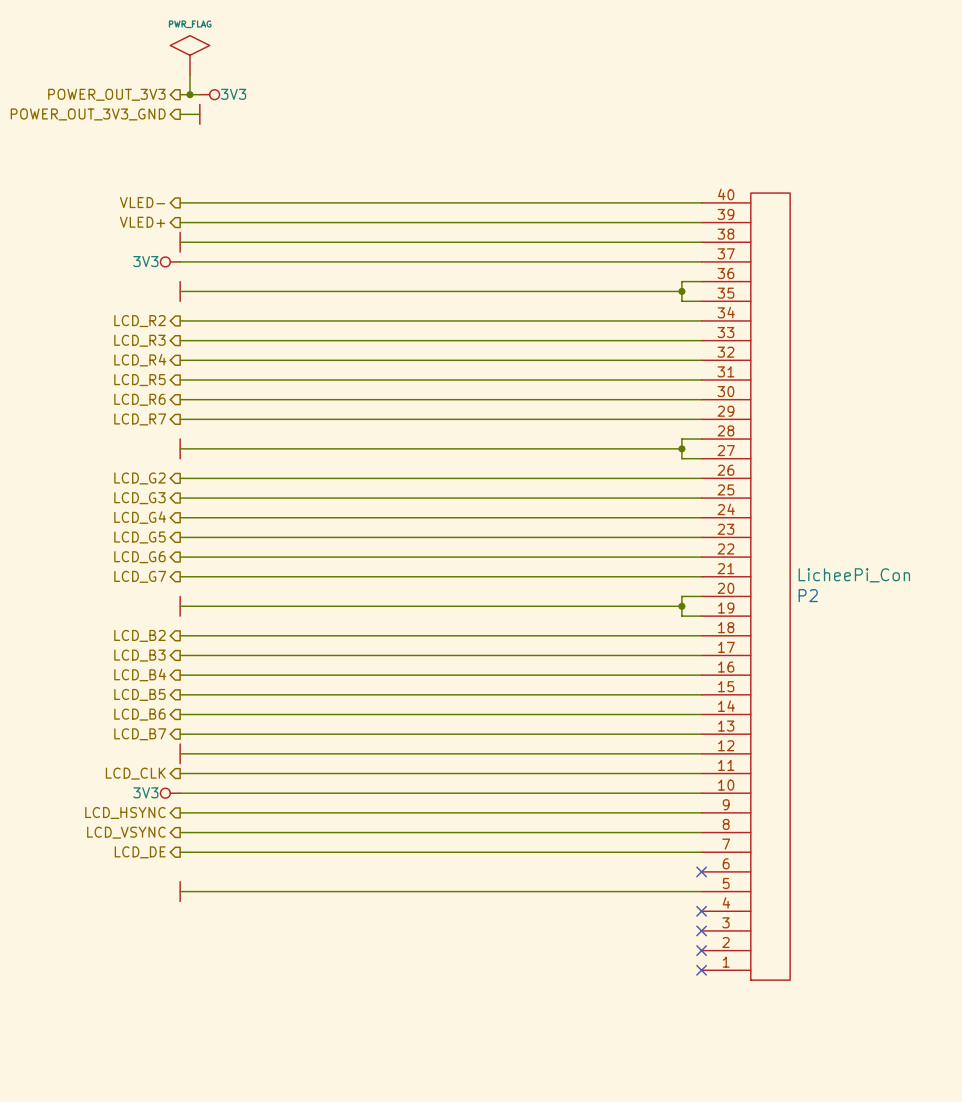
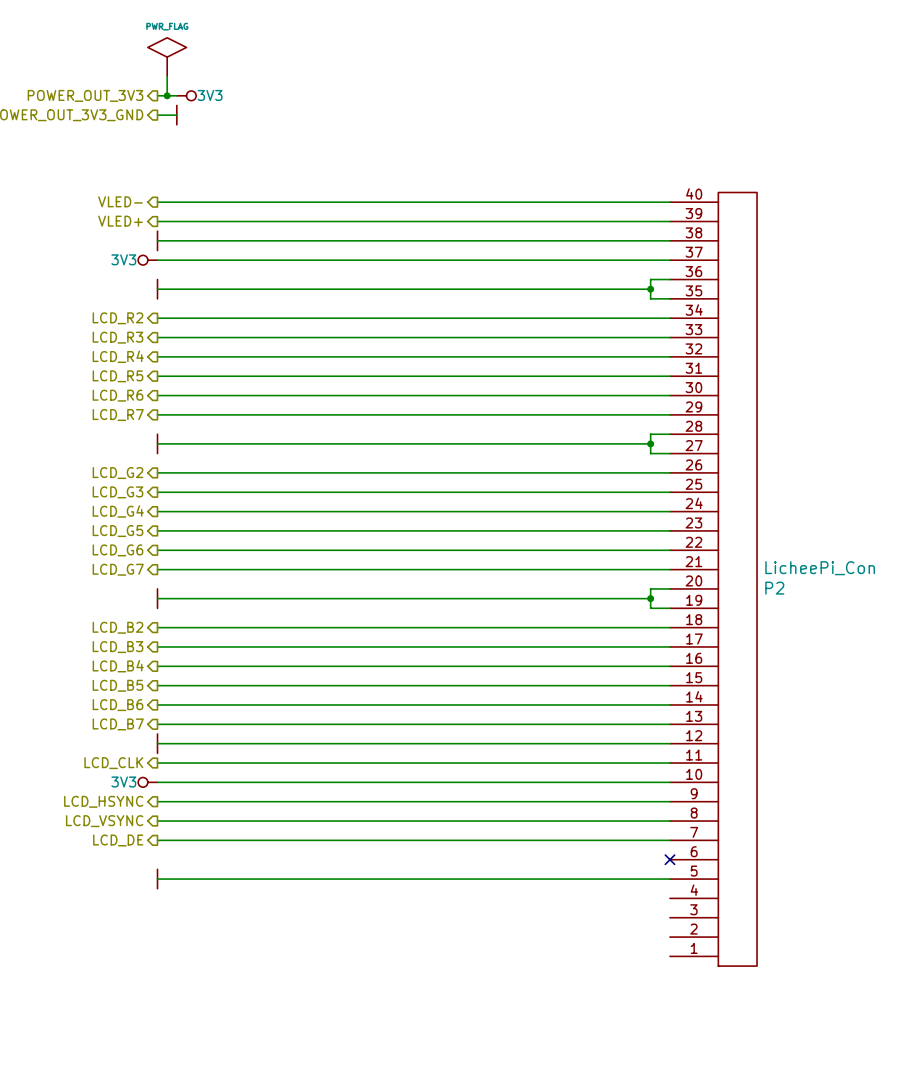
no-connect mark: (701, 911) -> none
no-connect mark: (701, 930) -> none
no-connect mark: (701, 950) -> none
no-connect mark: (701, 970) -> none

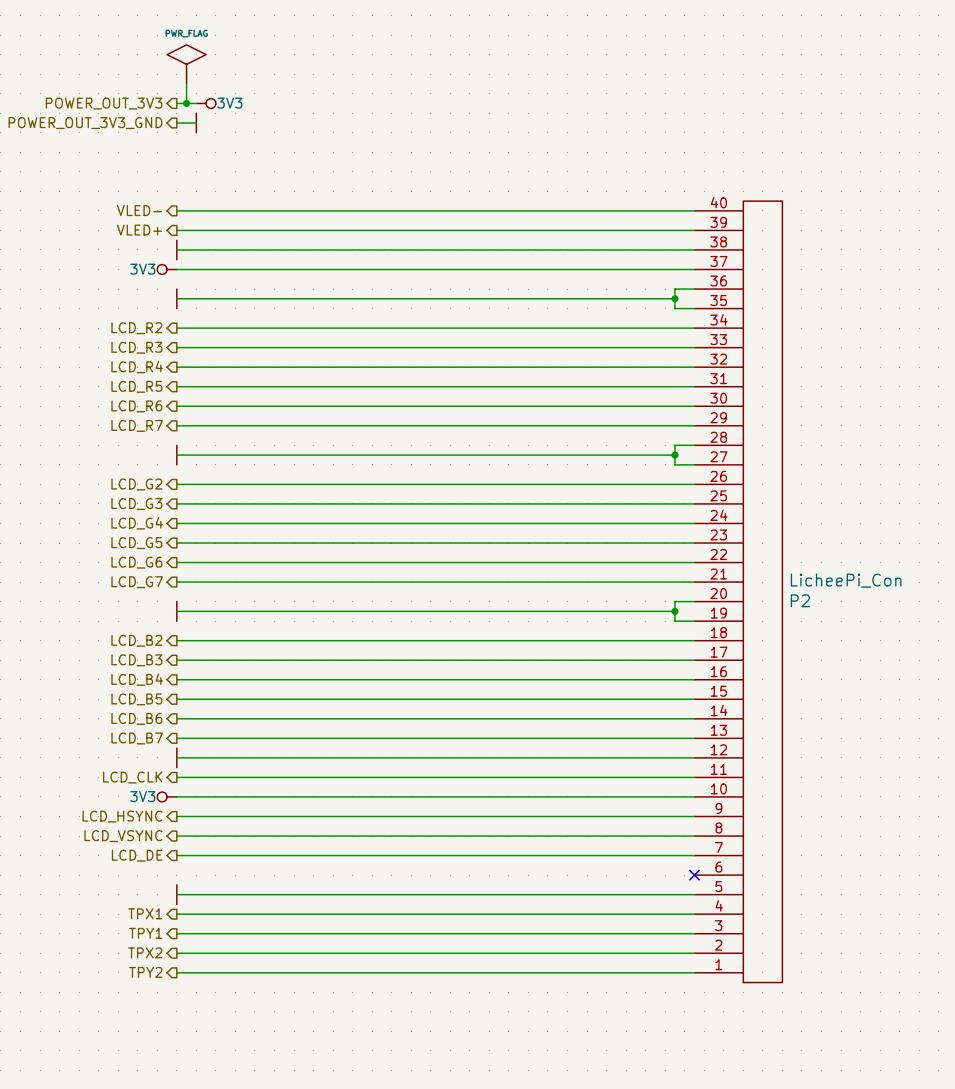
hierarchical label: none -> TPX1 (145, 913)
wire: none -> (176, 914) (694, 914)
hierarchical label: none -> TPY1 (145, 933)
wire: none -> (176, 933) (694, 933)
hierarchical label: none -> TPX2 (145, 952)
wire: none -> (176, 953) (694, 953)
hierarchical label: none -> TPY2 (145, 972)
wire: none -> (176, 972) (694, 972)

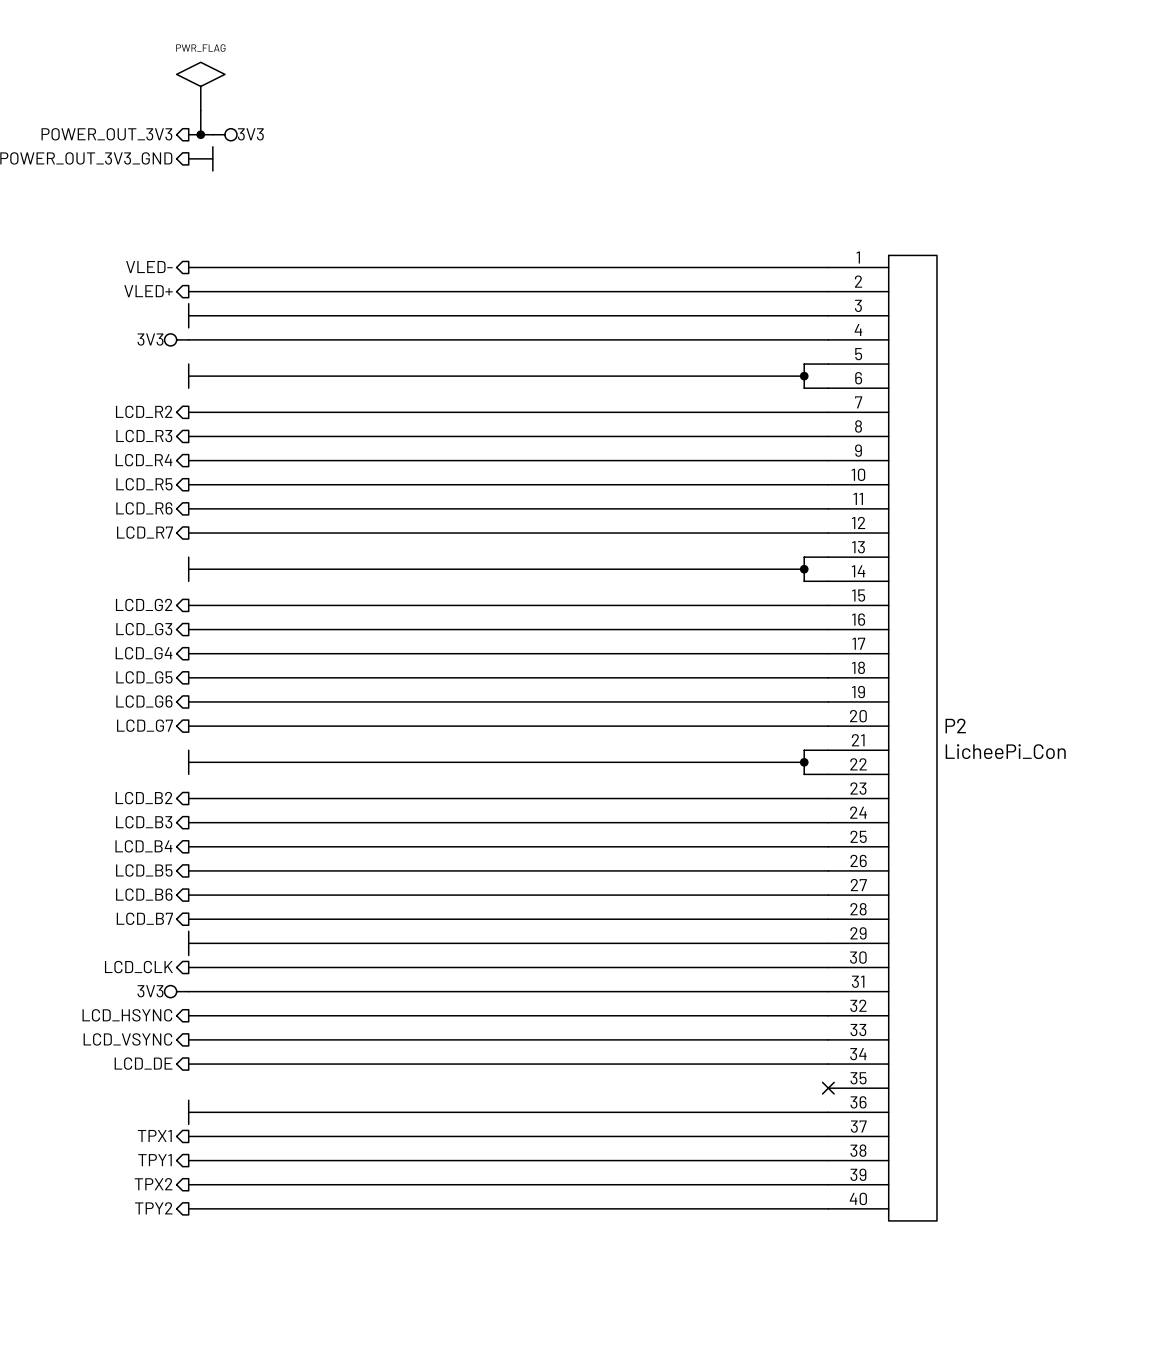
P2 flip: as is (762, 591) -> up-down (912, 738)

